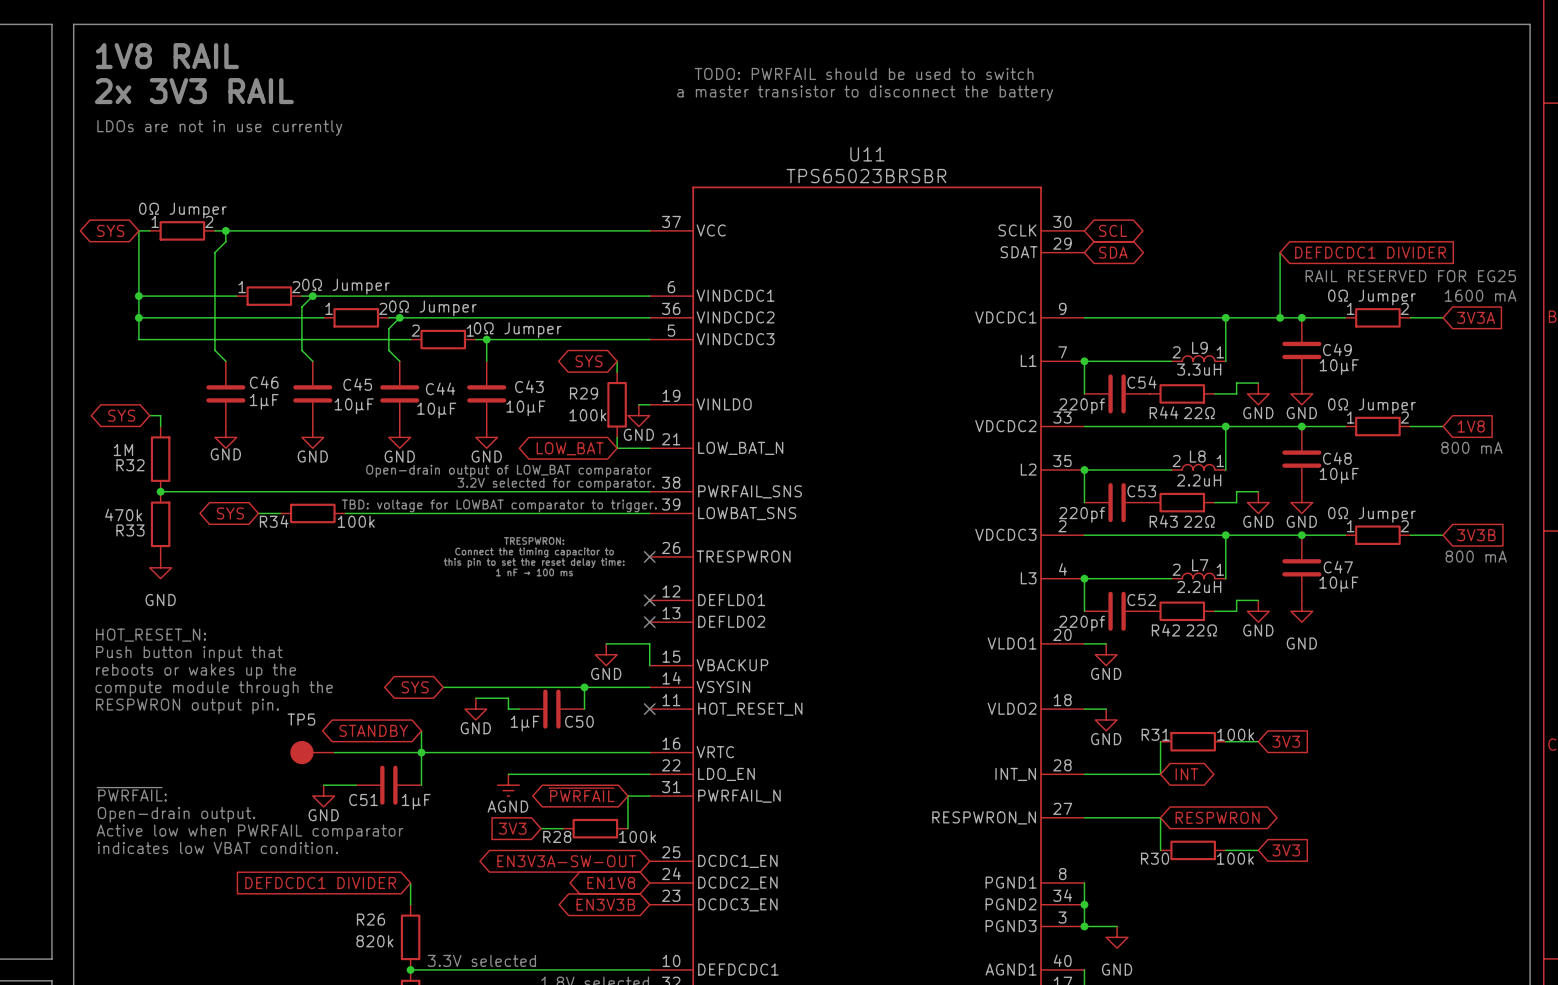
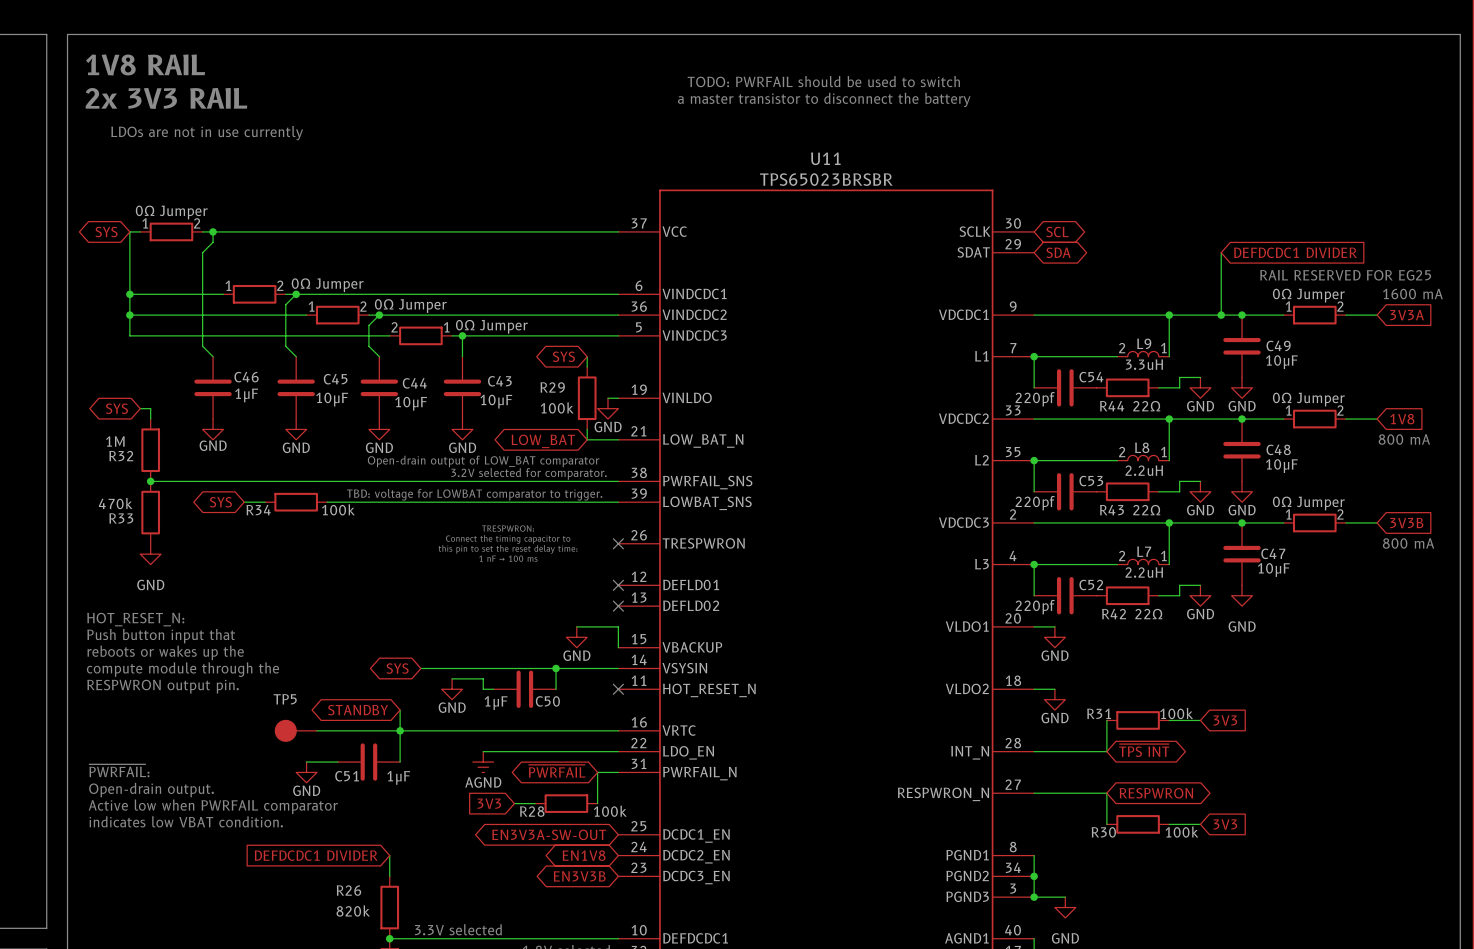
global label: INT (1186, 774) -> ~{TPS INT} (1144, 750)

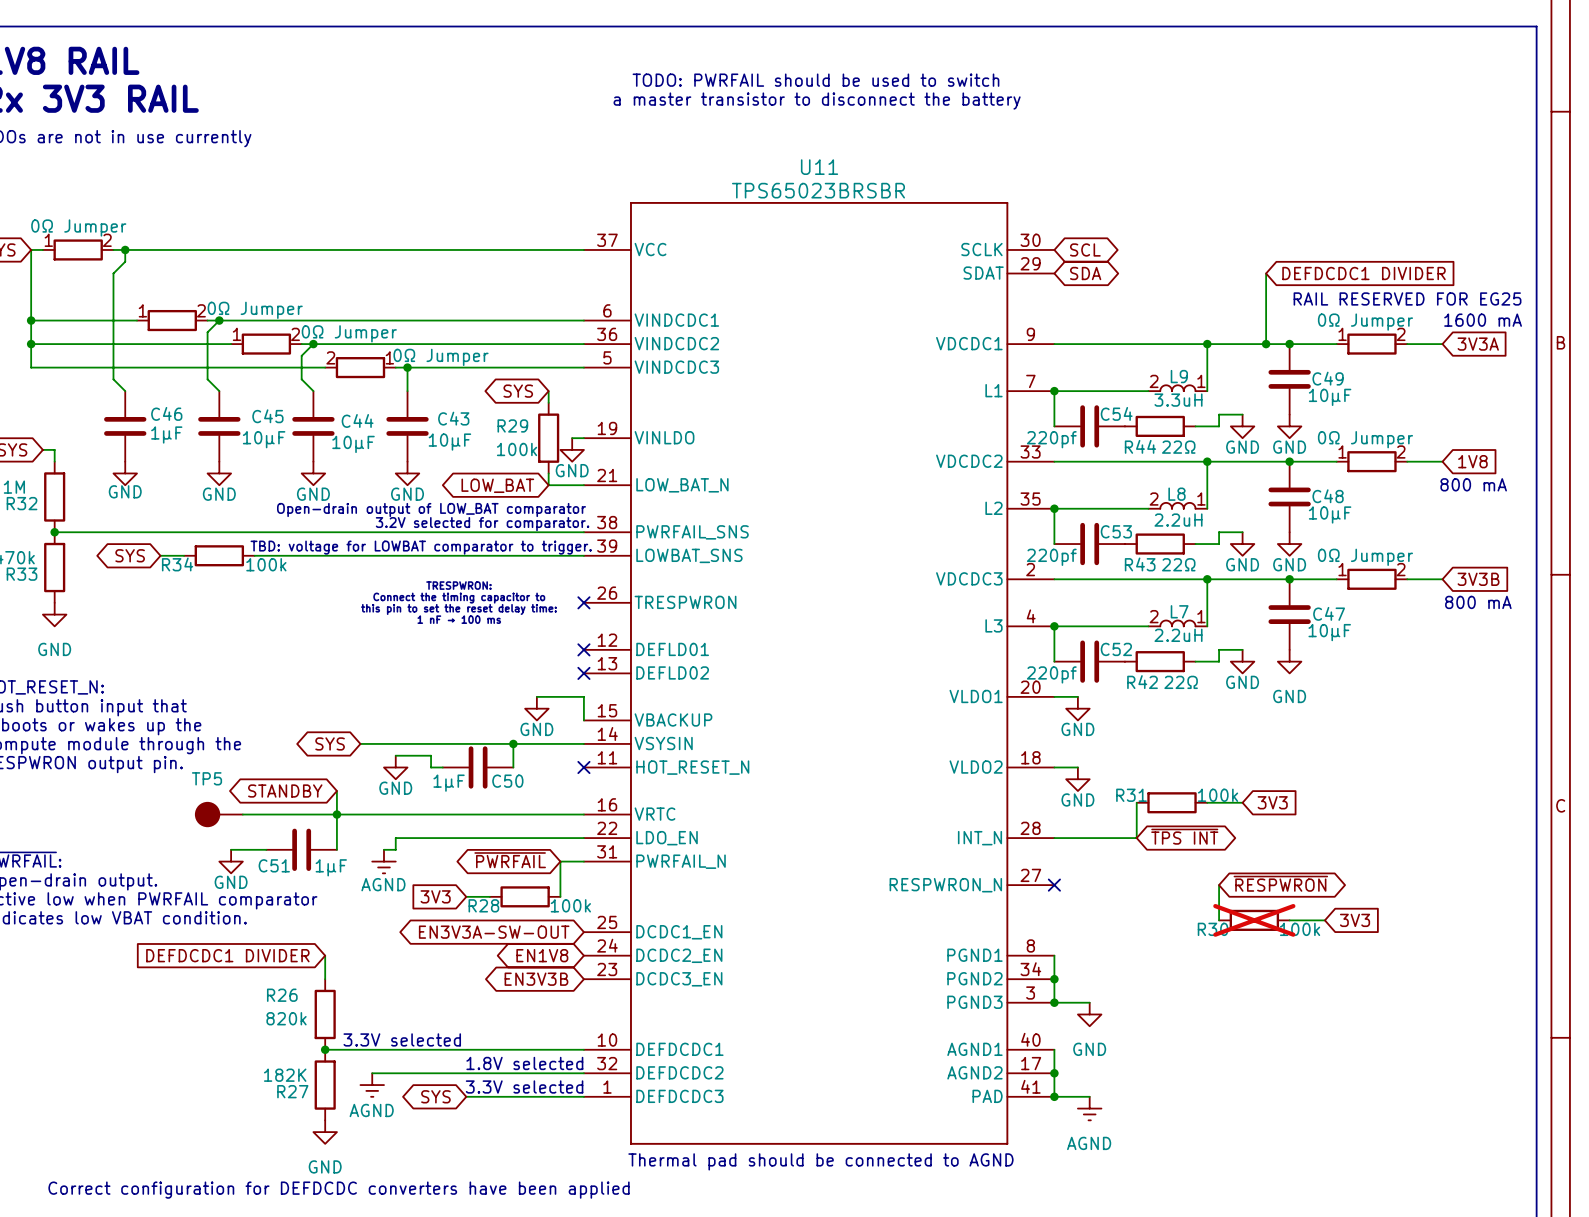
wire: none -> (431, 838) (395, 838) (395, 849) (383, 849)
power symbol position: AGND (483, 762) -> AGND (383, 861)
wire: (1034, 793) (1106, 793) (1106, 824) -> none
no-connect mark: none -> (1054, 885)
global label: RESPWRON (1156, 793) -> ~{RESPWRON} (1280, 883)
wire: none -> (1219, 885) (1219, 920)
R30 position: (1138, 824) -> (1254, 920)
wire: (1169, 824) (1200, 824) -> (1289, 920) (1324, 920)
R30 do-not-place cross: none -> (1254, 920)
global label position: 3V3 (1225, 824) -> 3V3 (1355, 920)

